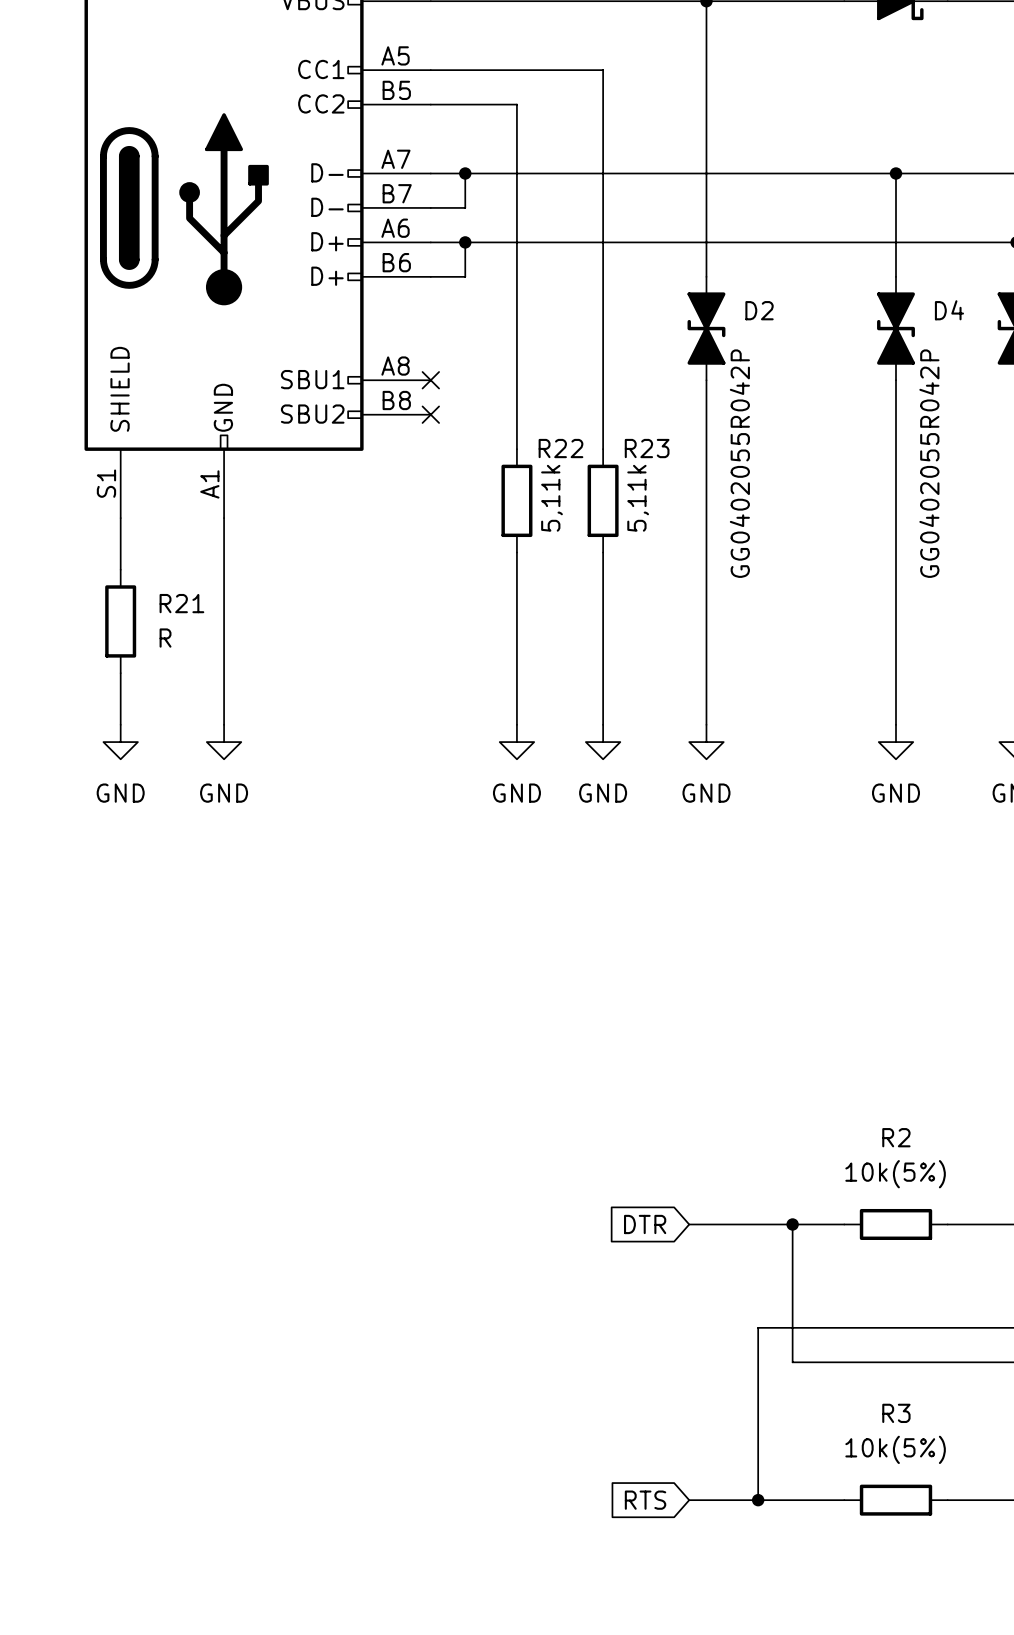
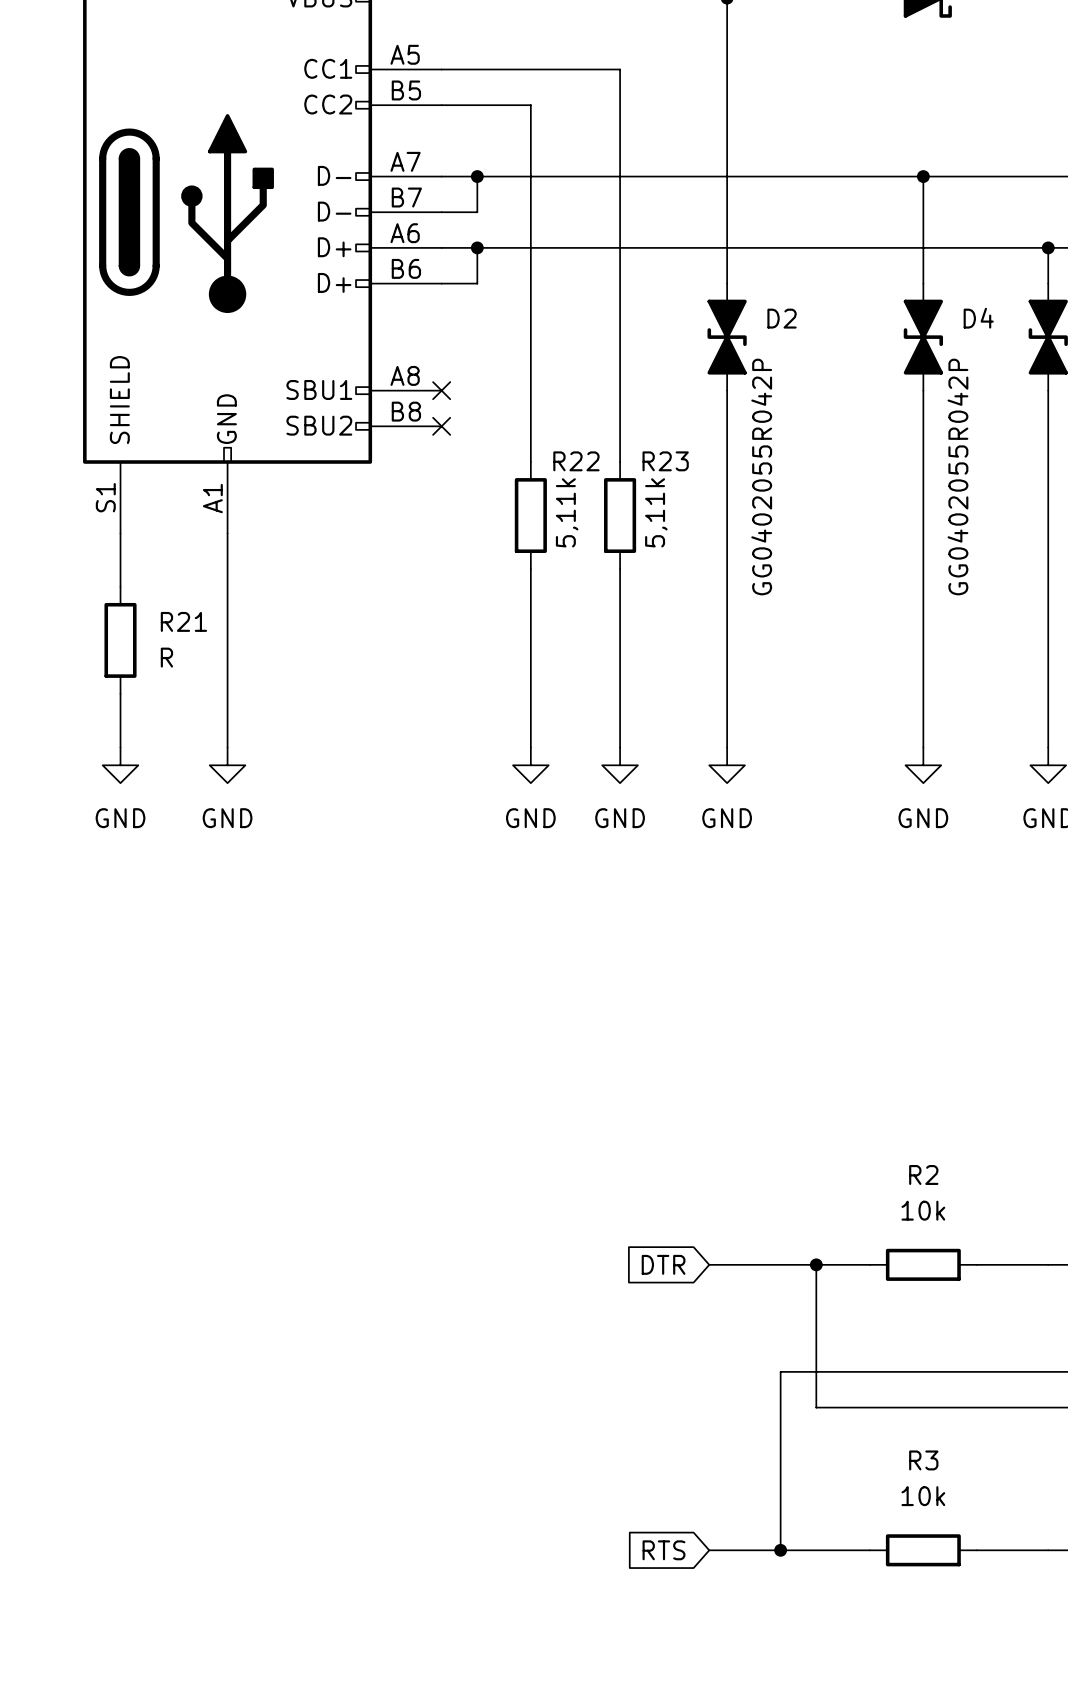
R2 value: 10k(5%) (895, 1174) -> 10k (923, 1210)
R3 value: 10k(5%) (895, 1449) -> 10k (923, 1496)

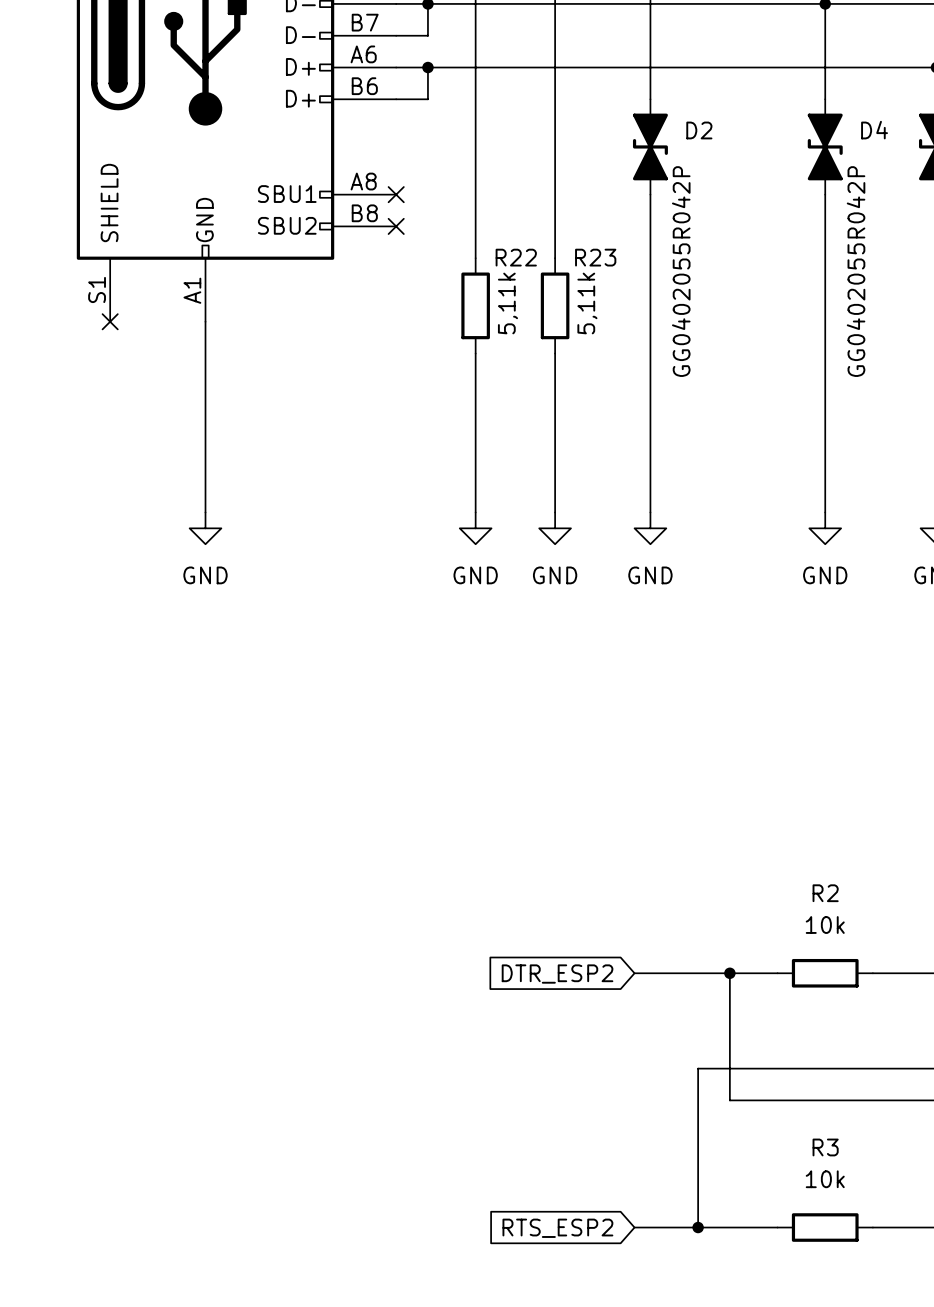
wire: (120, 533) (120, 586) -> none
no-connect mark: none -> (110, 321)
R21: R (120, 640) -> none
wire: (120, 693) (120, 747) -> none
power symbol: GND (120, 765) -> none
global label: DTR (663, 1264) -> DTR_ESP2 (557, 974)
global label: RTS (664, 1550) -> RTS_ESP2 (557, 1228)

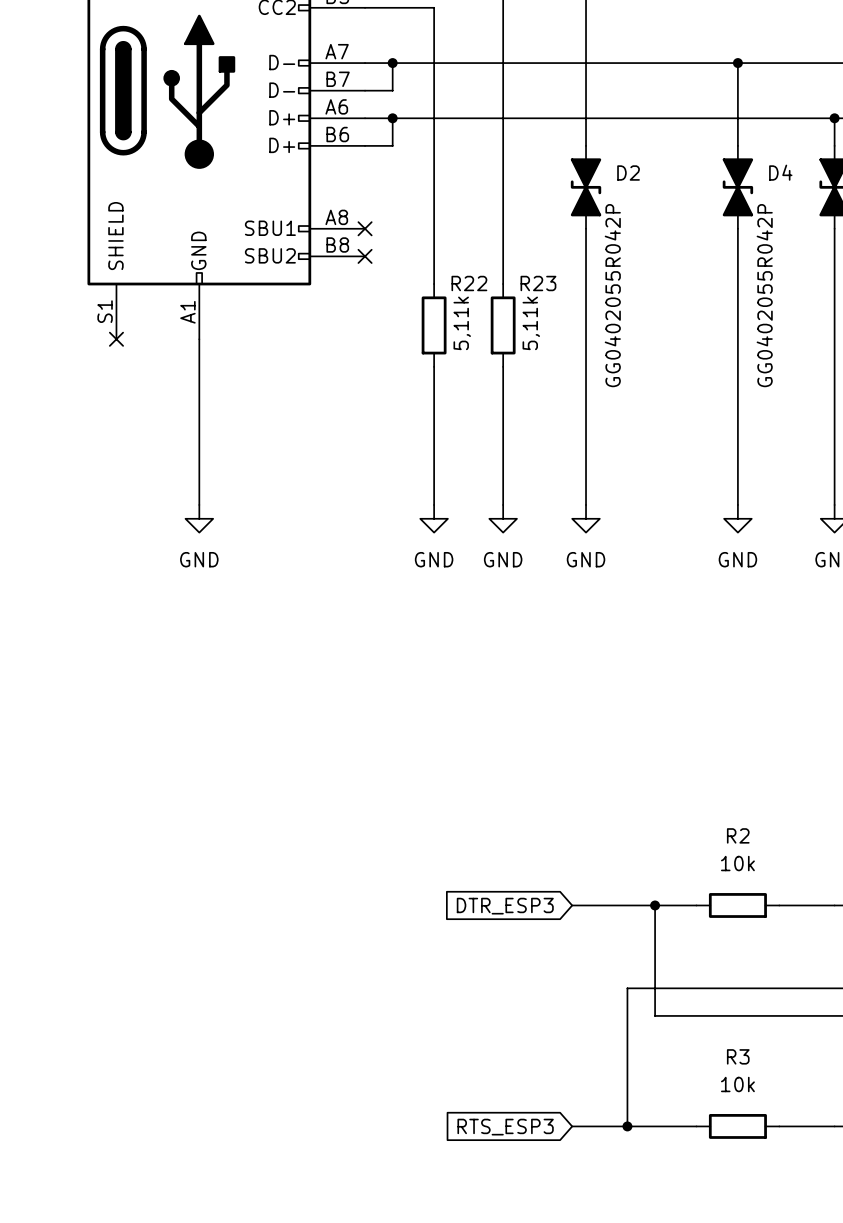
global label: DTR_ESP2 (557, 974) -> DTR_ESP3 (505, 906)
global label: RTS_ESP2 (557, 1228) -> RTS_ESP3 (505, 1127)

